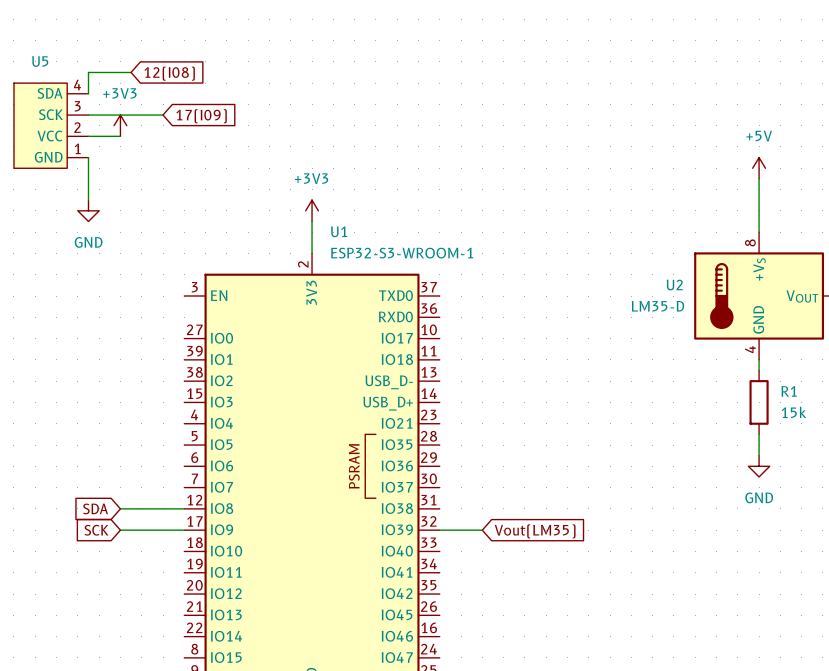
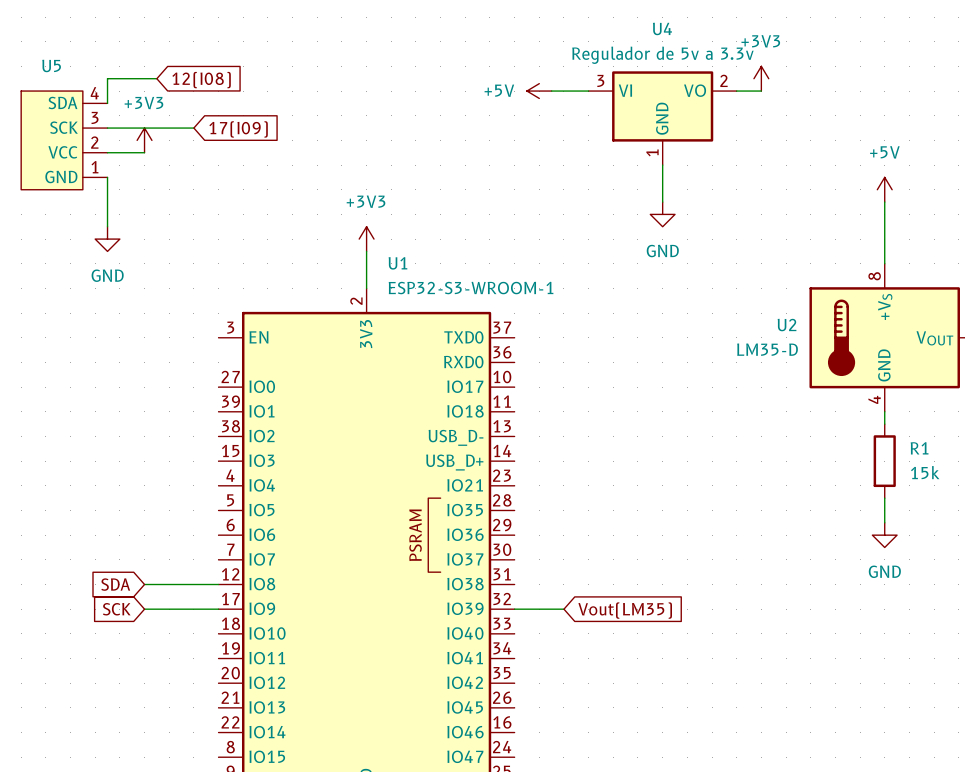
power symbol: none -> +3V3 (761, 78)
power symbol: none -> +5V (539, 91)
wire: none -> (551, 91) (588, 91)
wire: none -> (736, 91) (761, 91)
U4: none -> Regulador de 5v a 3.3v (662, 118)
wire: none -> (662, 165) (662, 202)
power symbol: none -> GND (662, 214)

